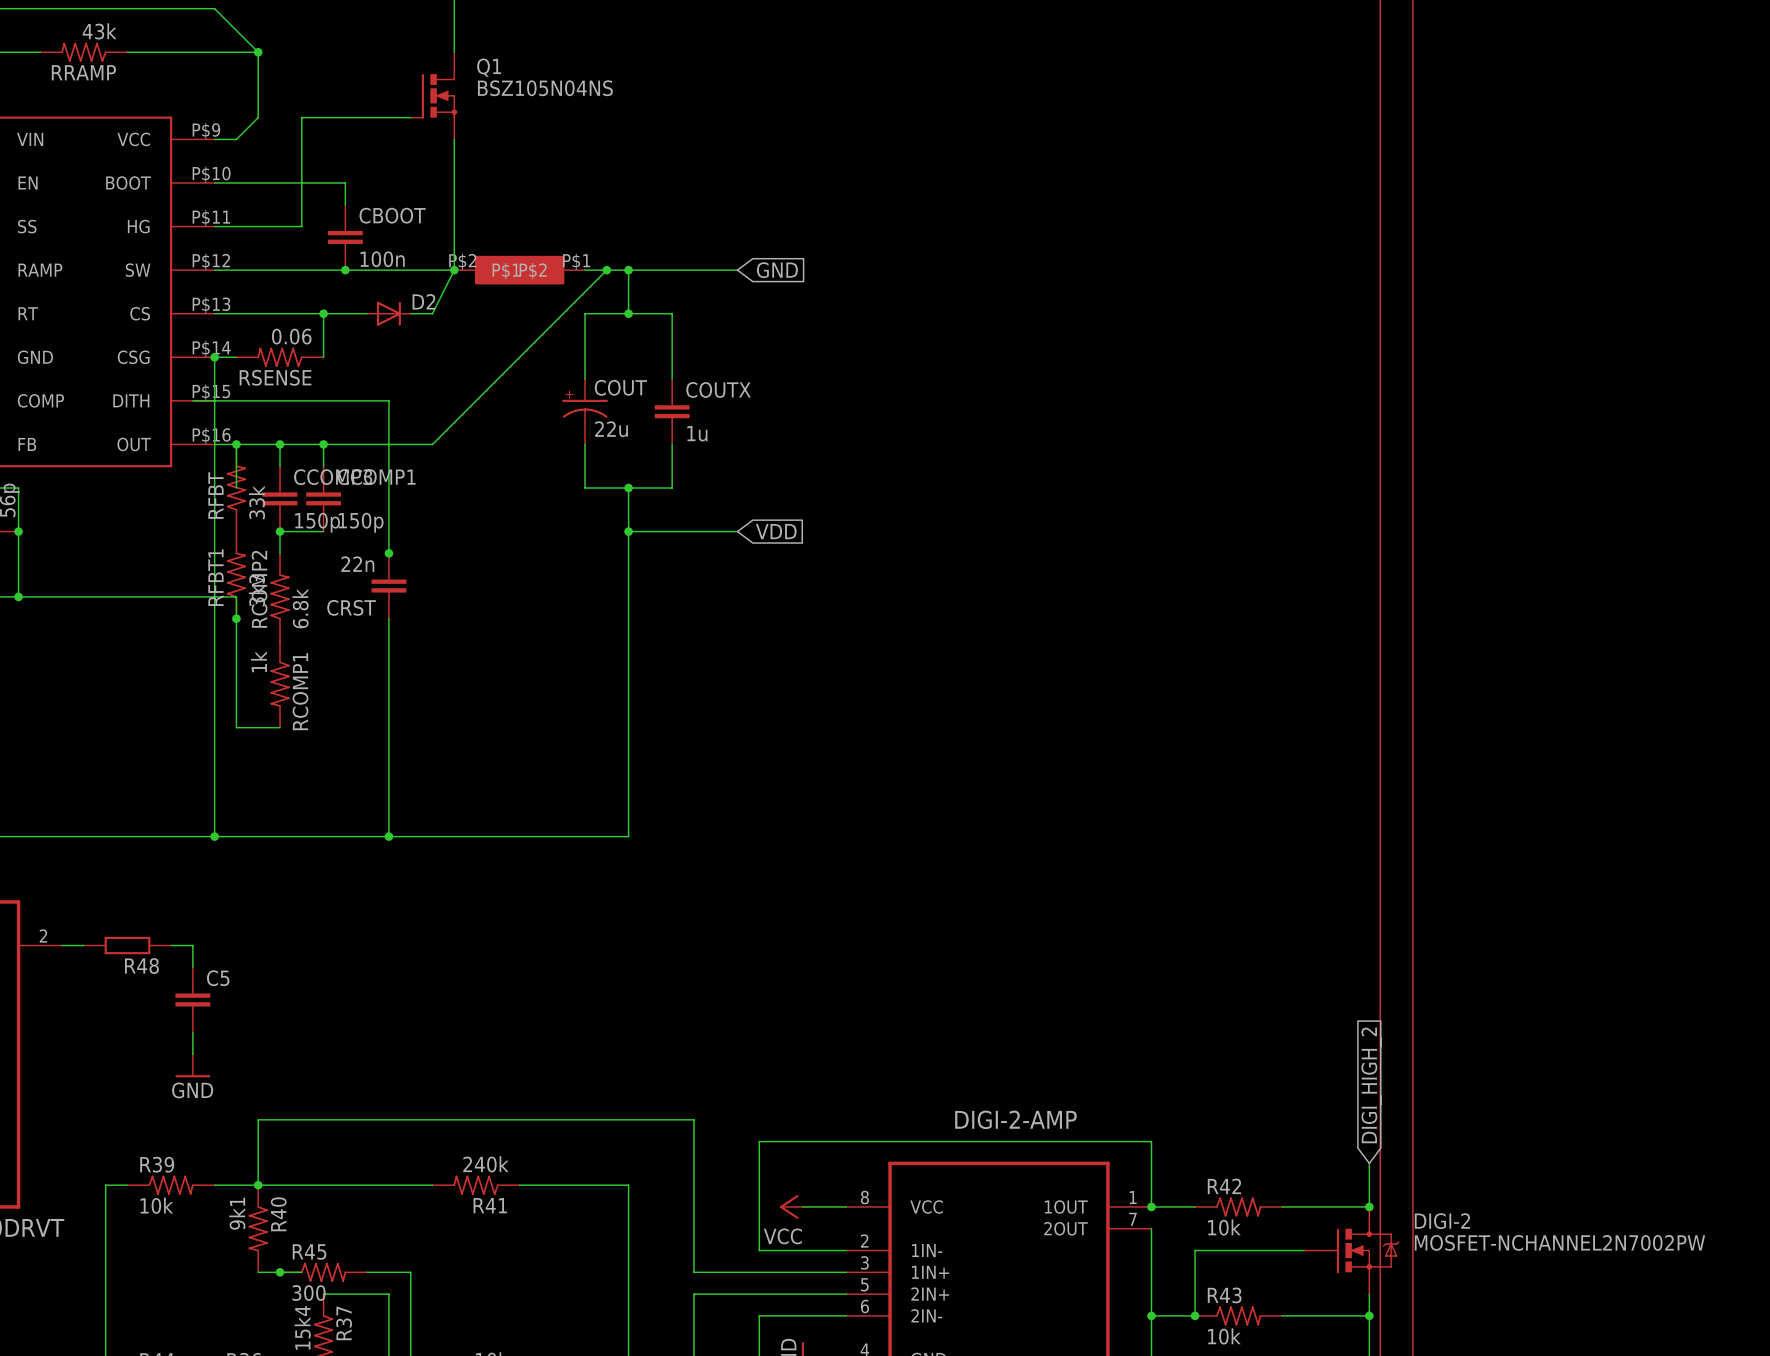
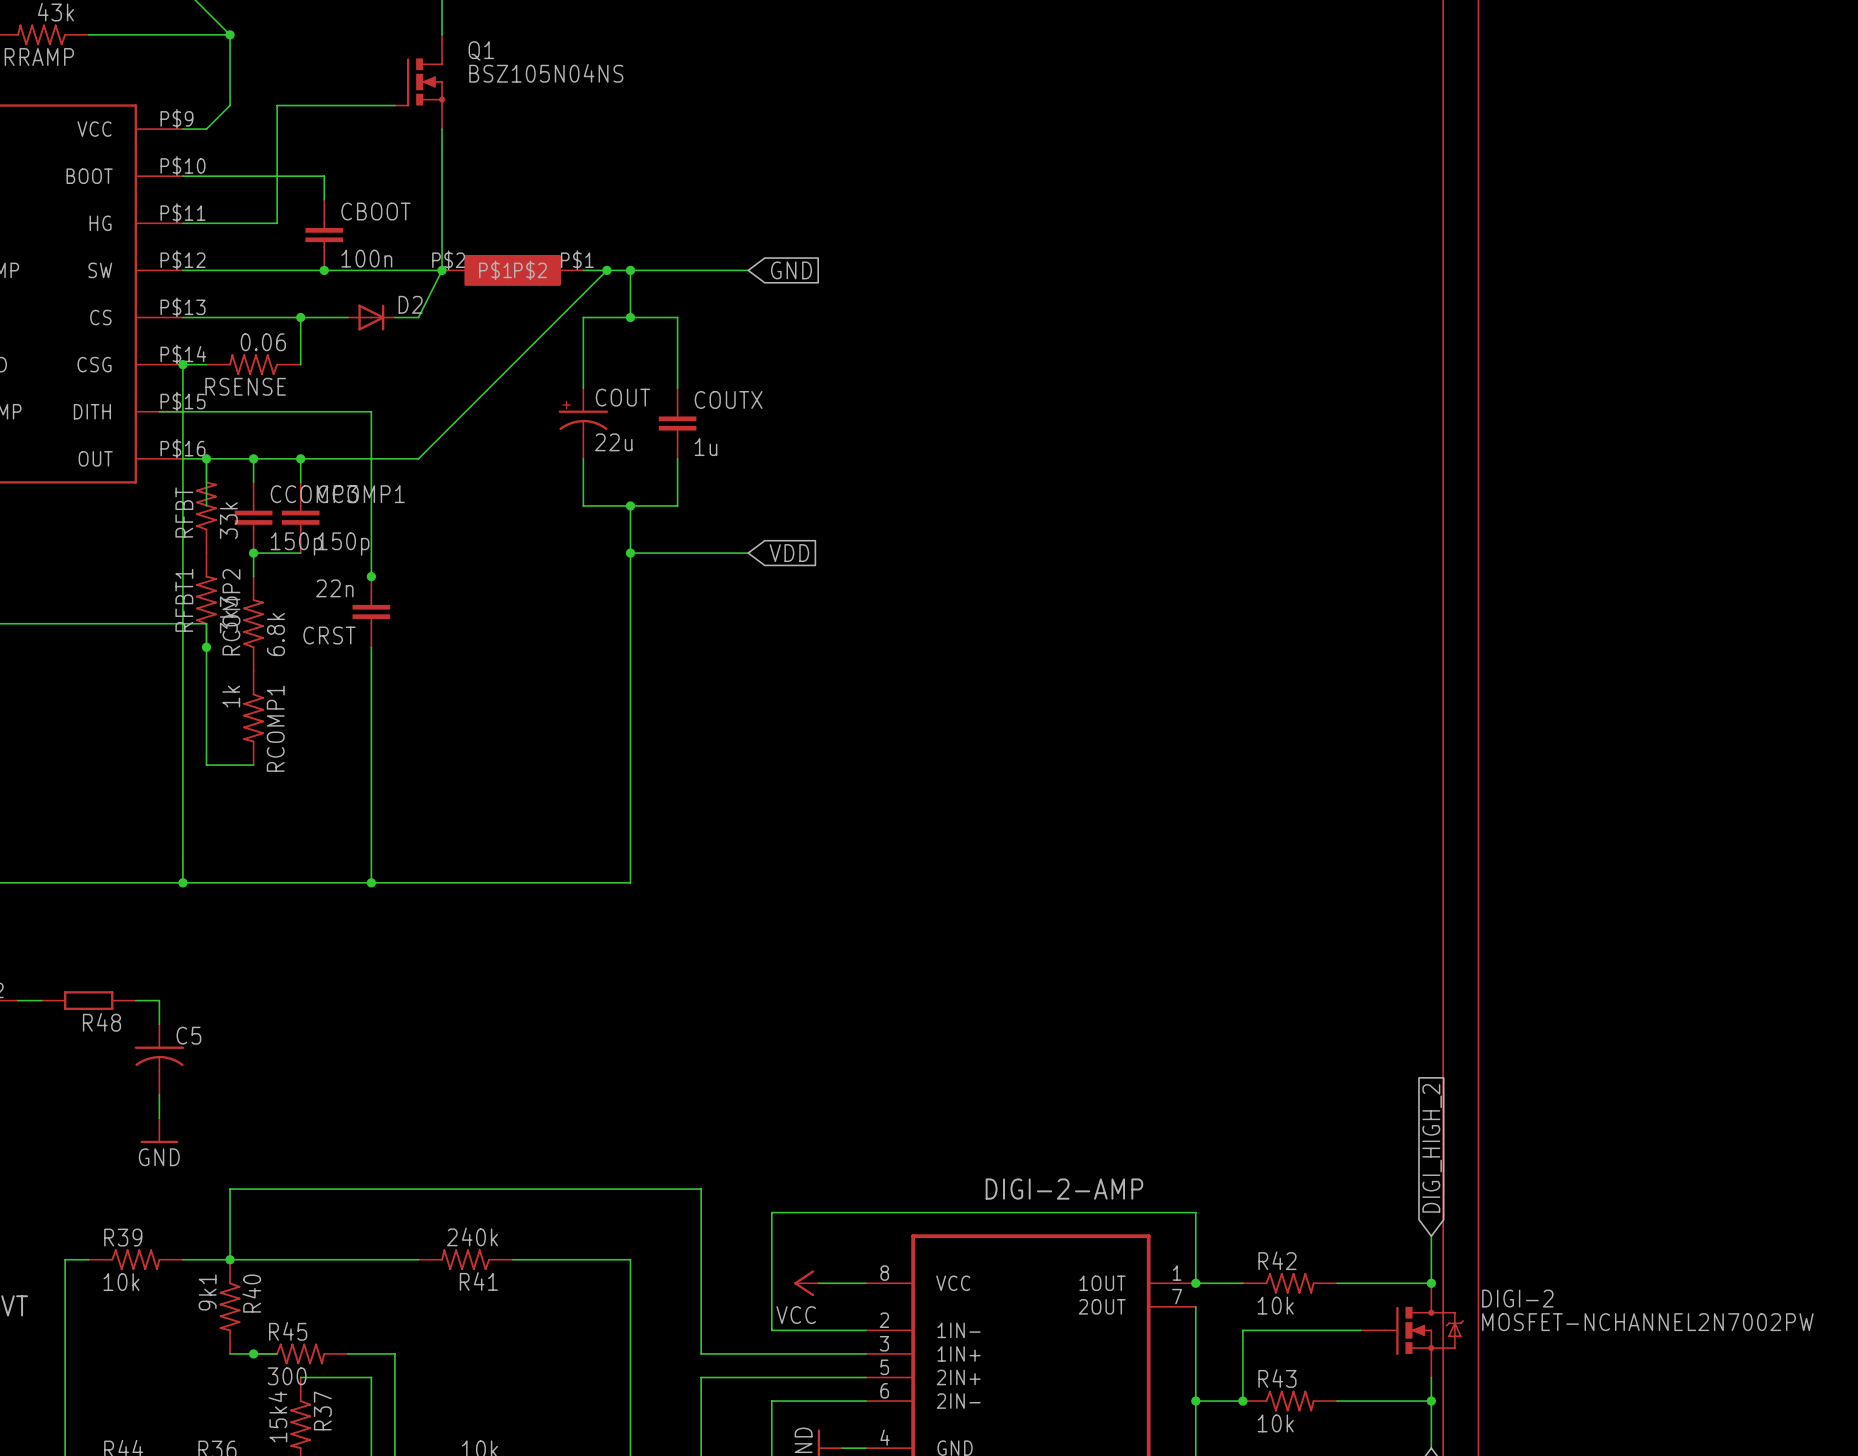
C5 symbol: [175, 967, 211, 1033] -> [134, 1024, 185, 1095]

